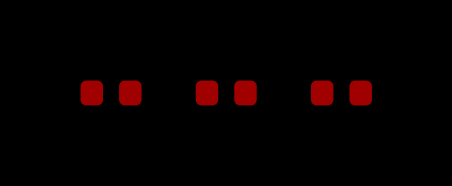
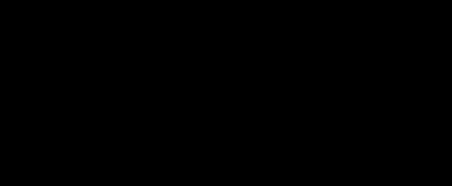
part: (111, 92) -> none
part: (226, 92) -> none
part: (341, 92) -> none

